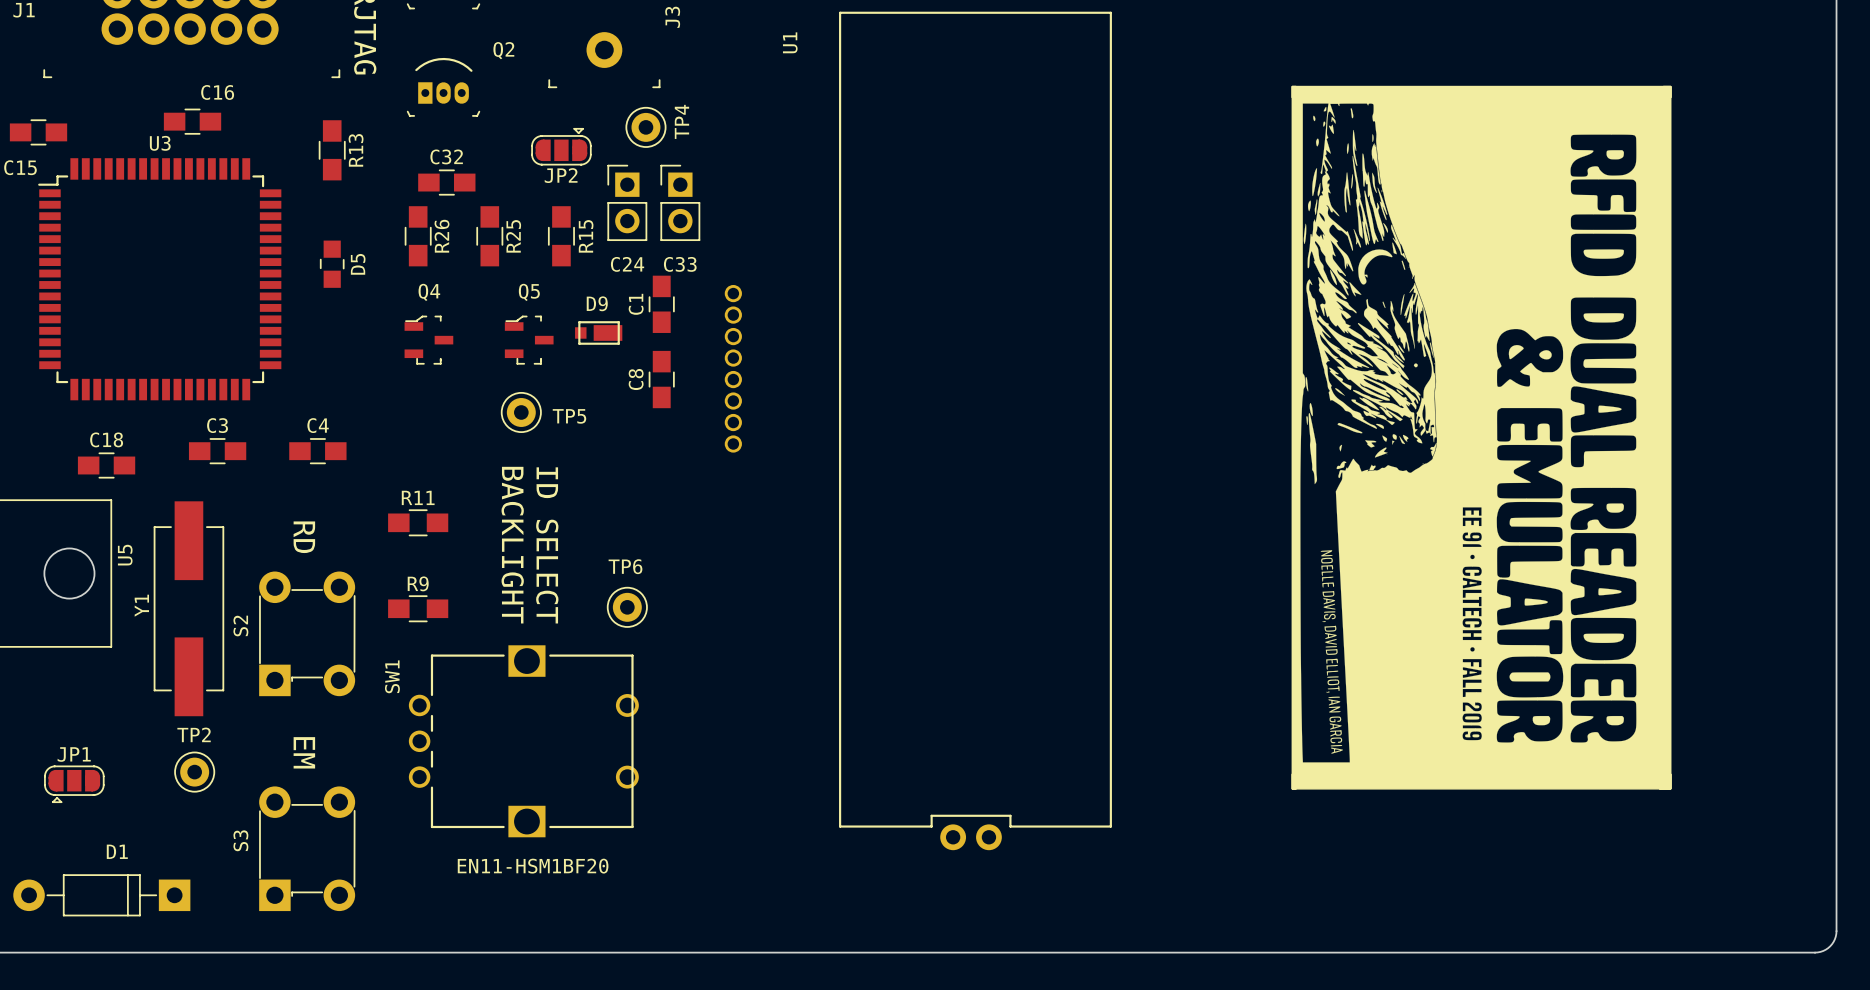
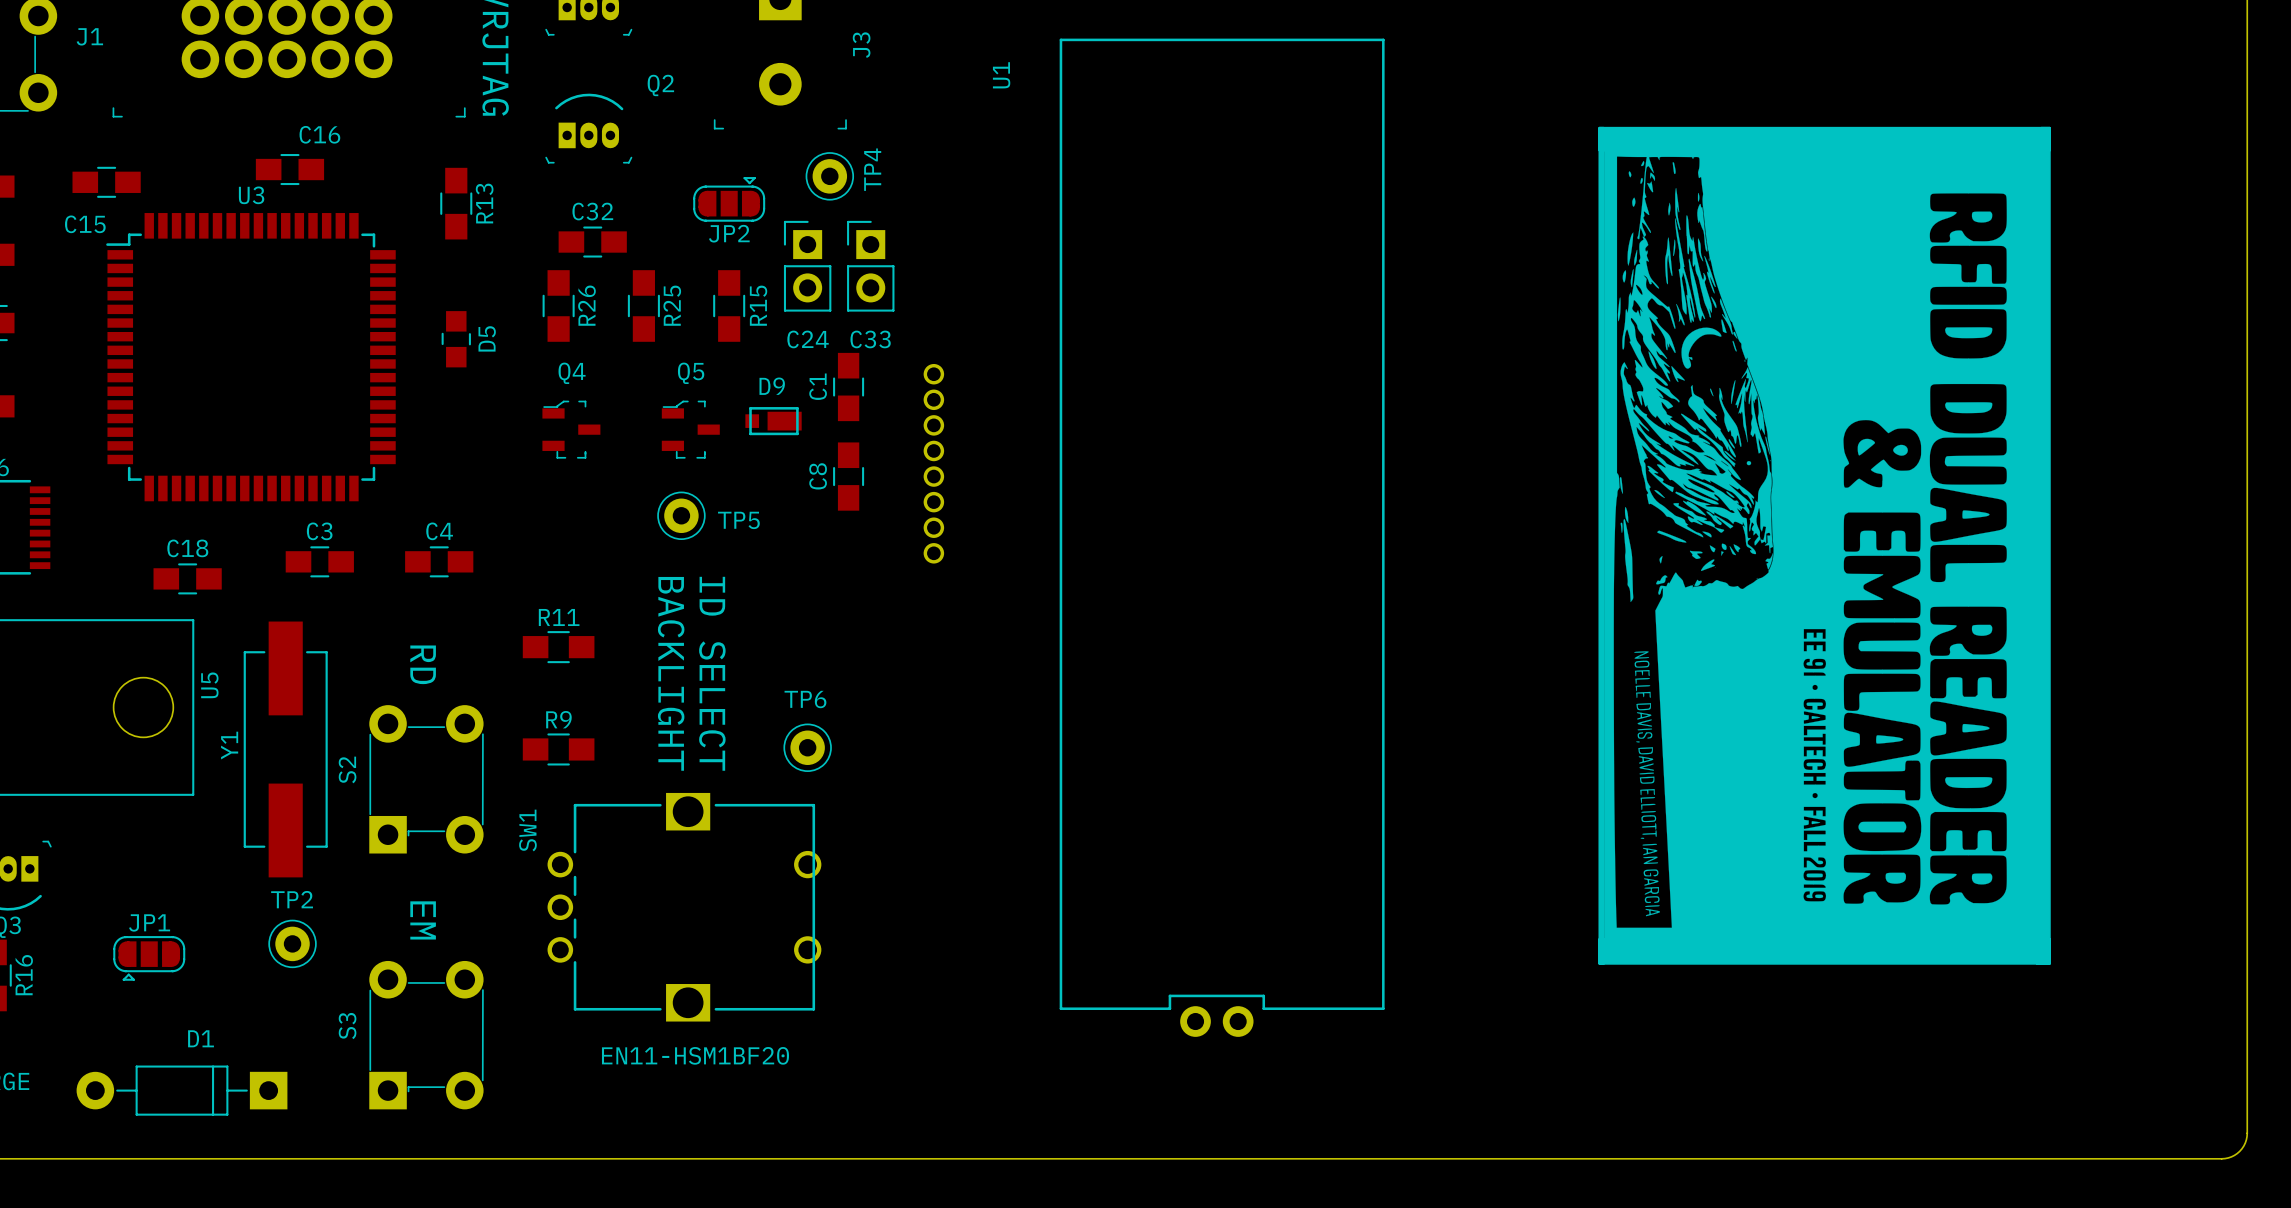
drawing shape: [1291, 85, 1672, 99] -> [1598, 126, 2051, 152]
drawing shape: [1292, 97, 1671, 775] -> [1604, 149, 2047, 942]
drawing shape: [1291, 773, 1672, 790] -> [1598, 938, 2051, 965]

